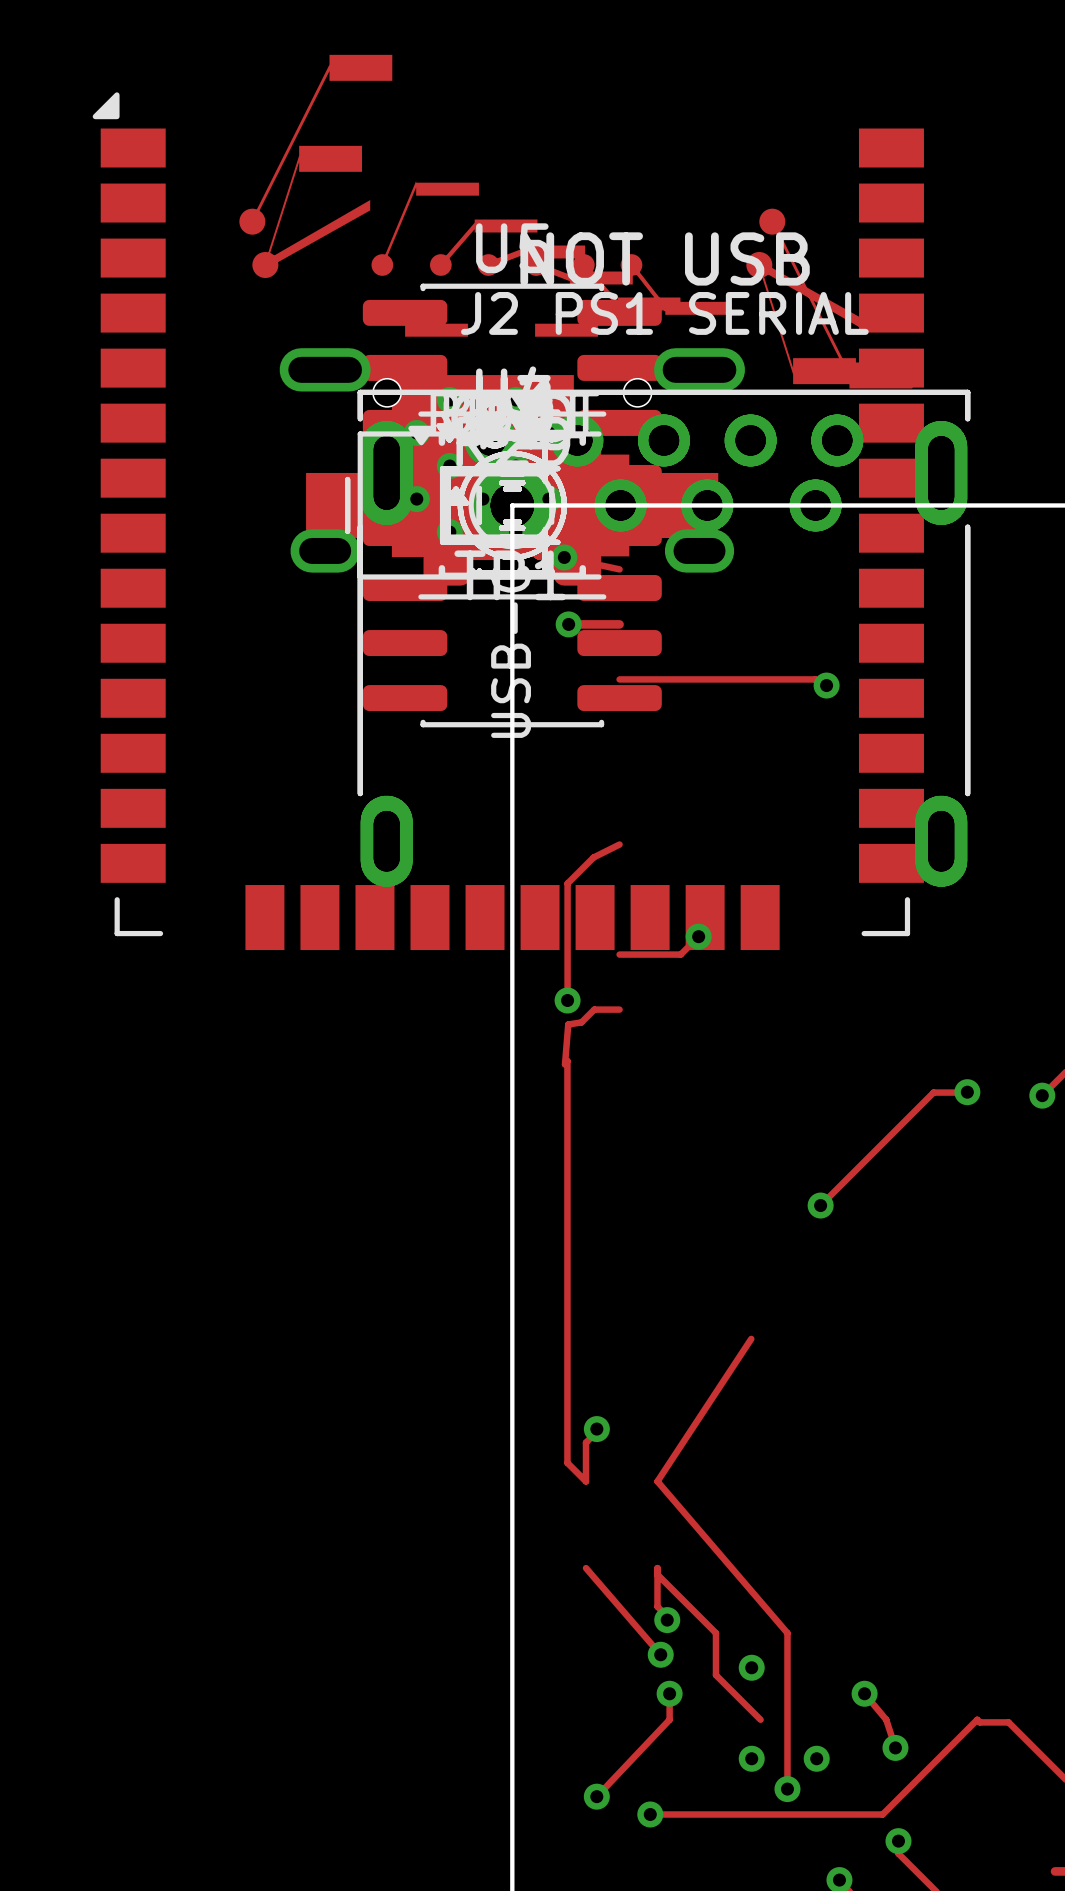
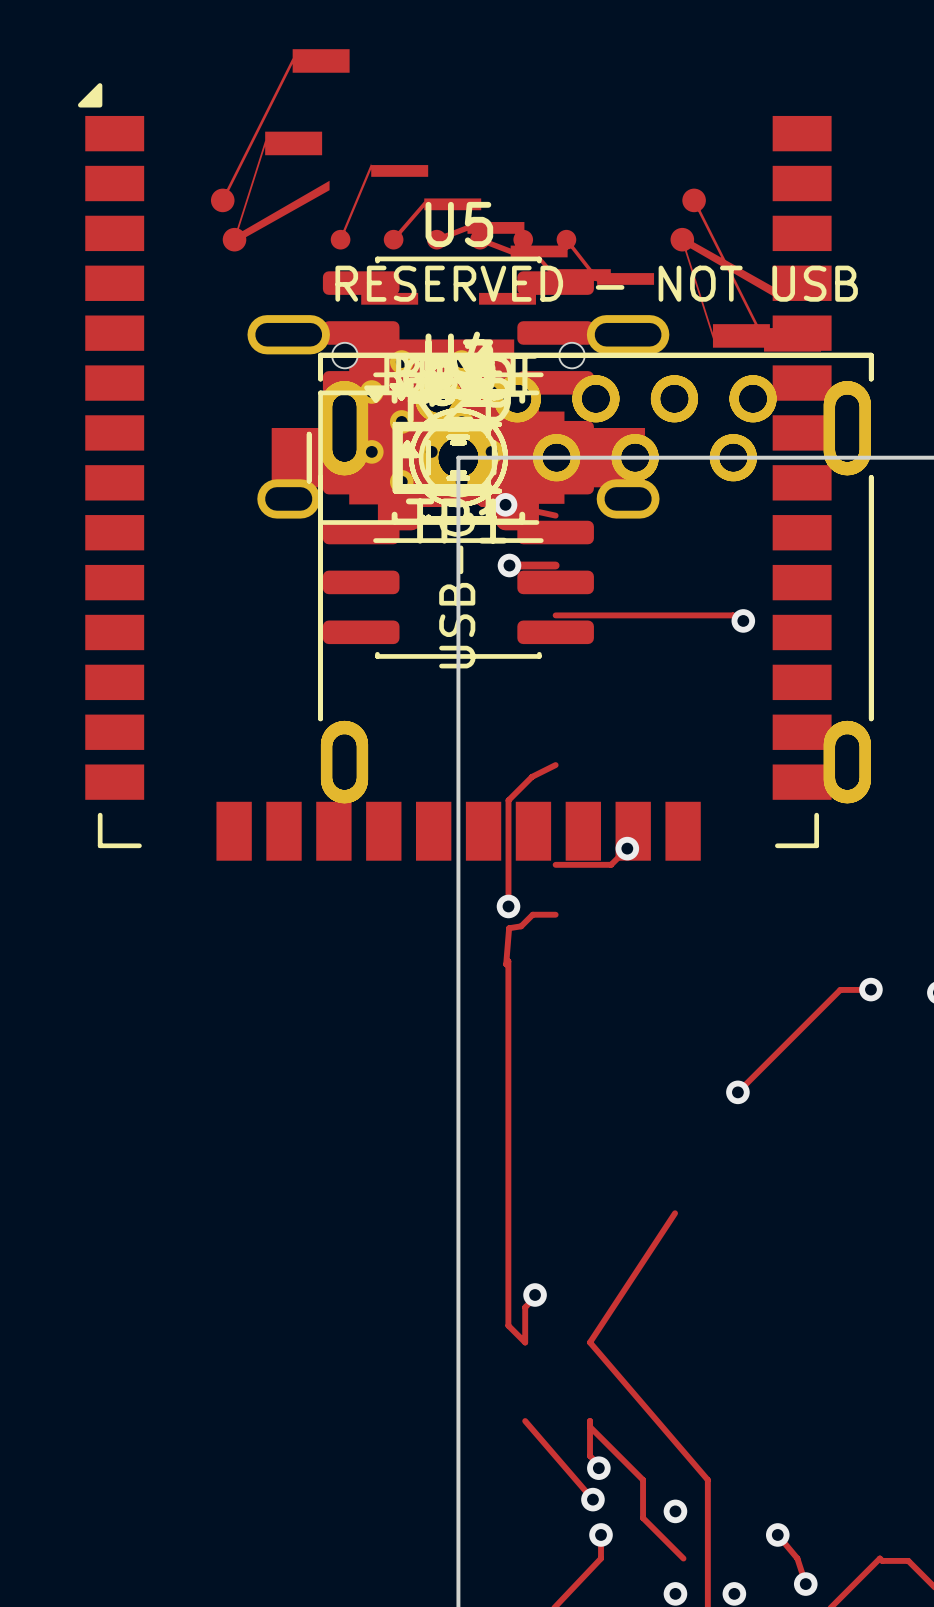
part text: NOT USB (665, 258) -> none
part text: J2 PS1 SERIAL (664, 313) -> RESERVED - NOT USB (596, 283)

